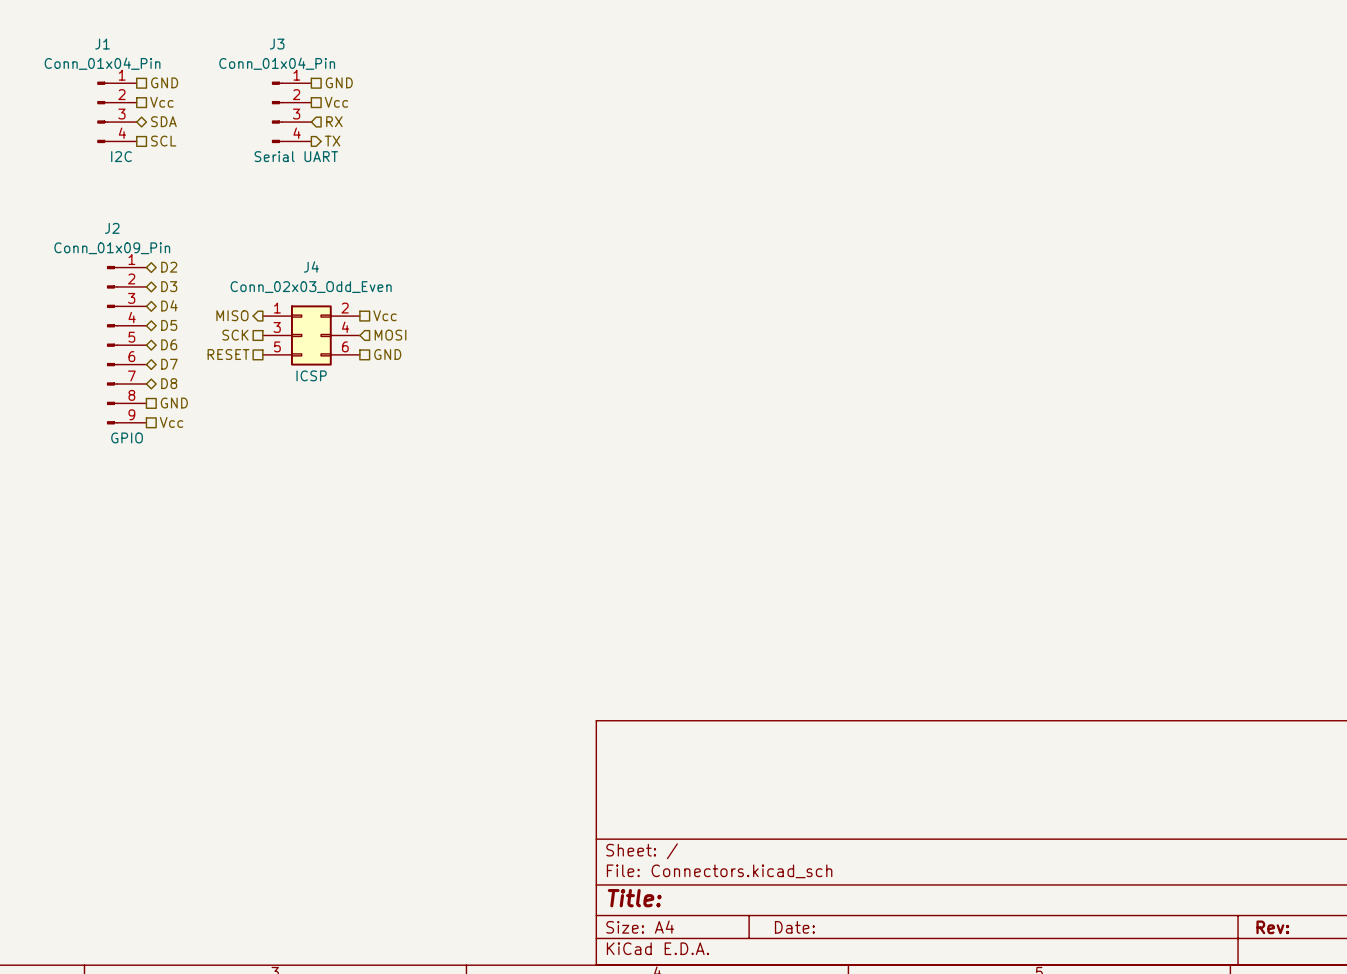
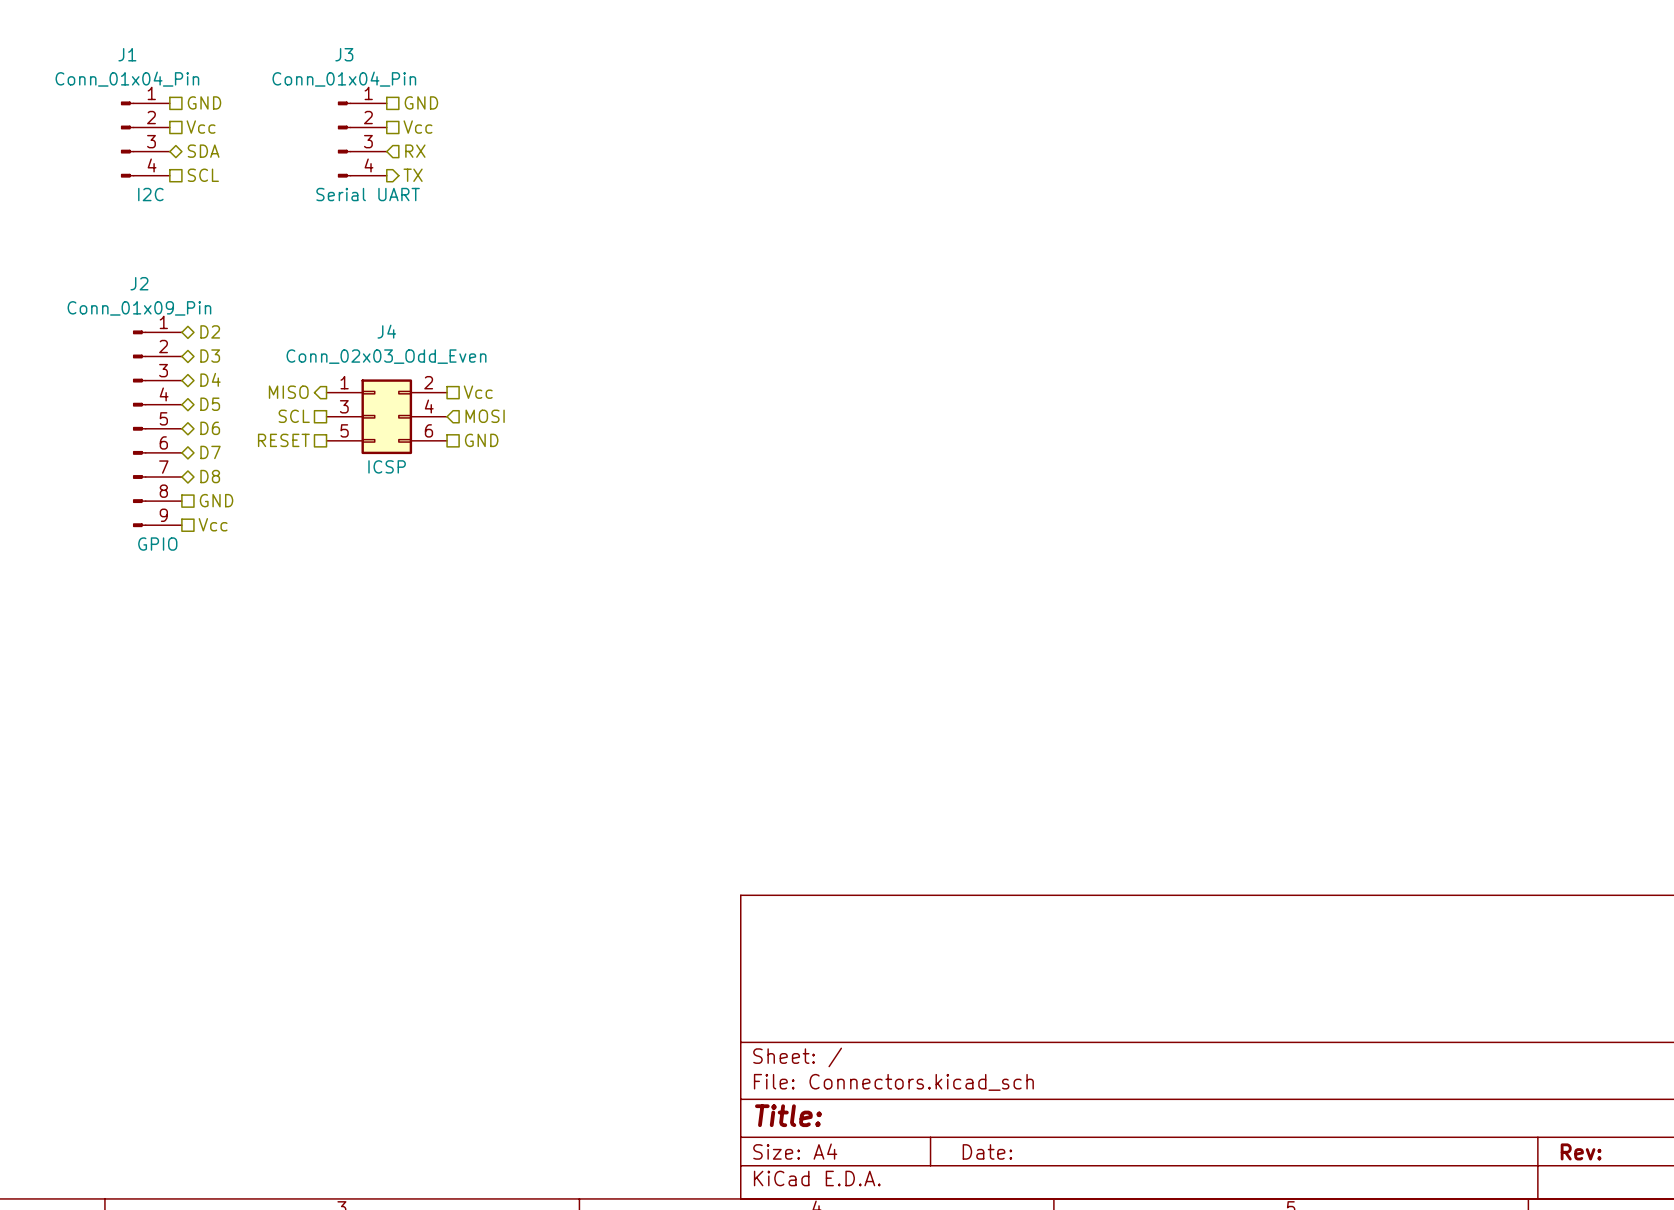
hierarchical label: SCK (235, 335) -> SCL (294, 416)

